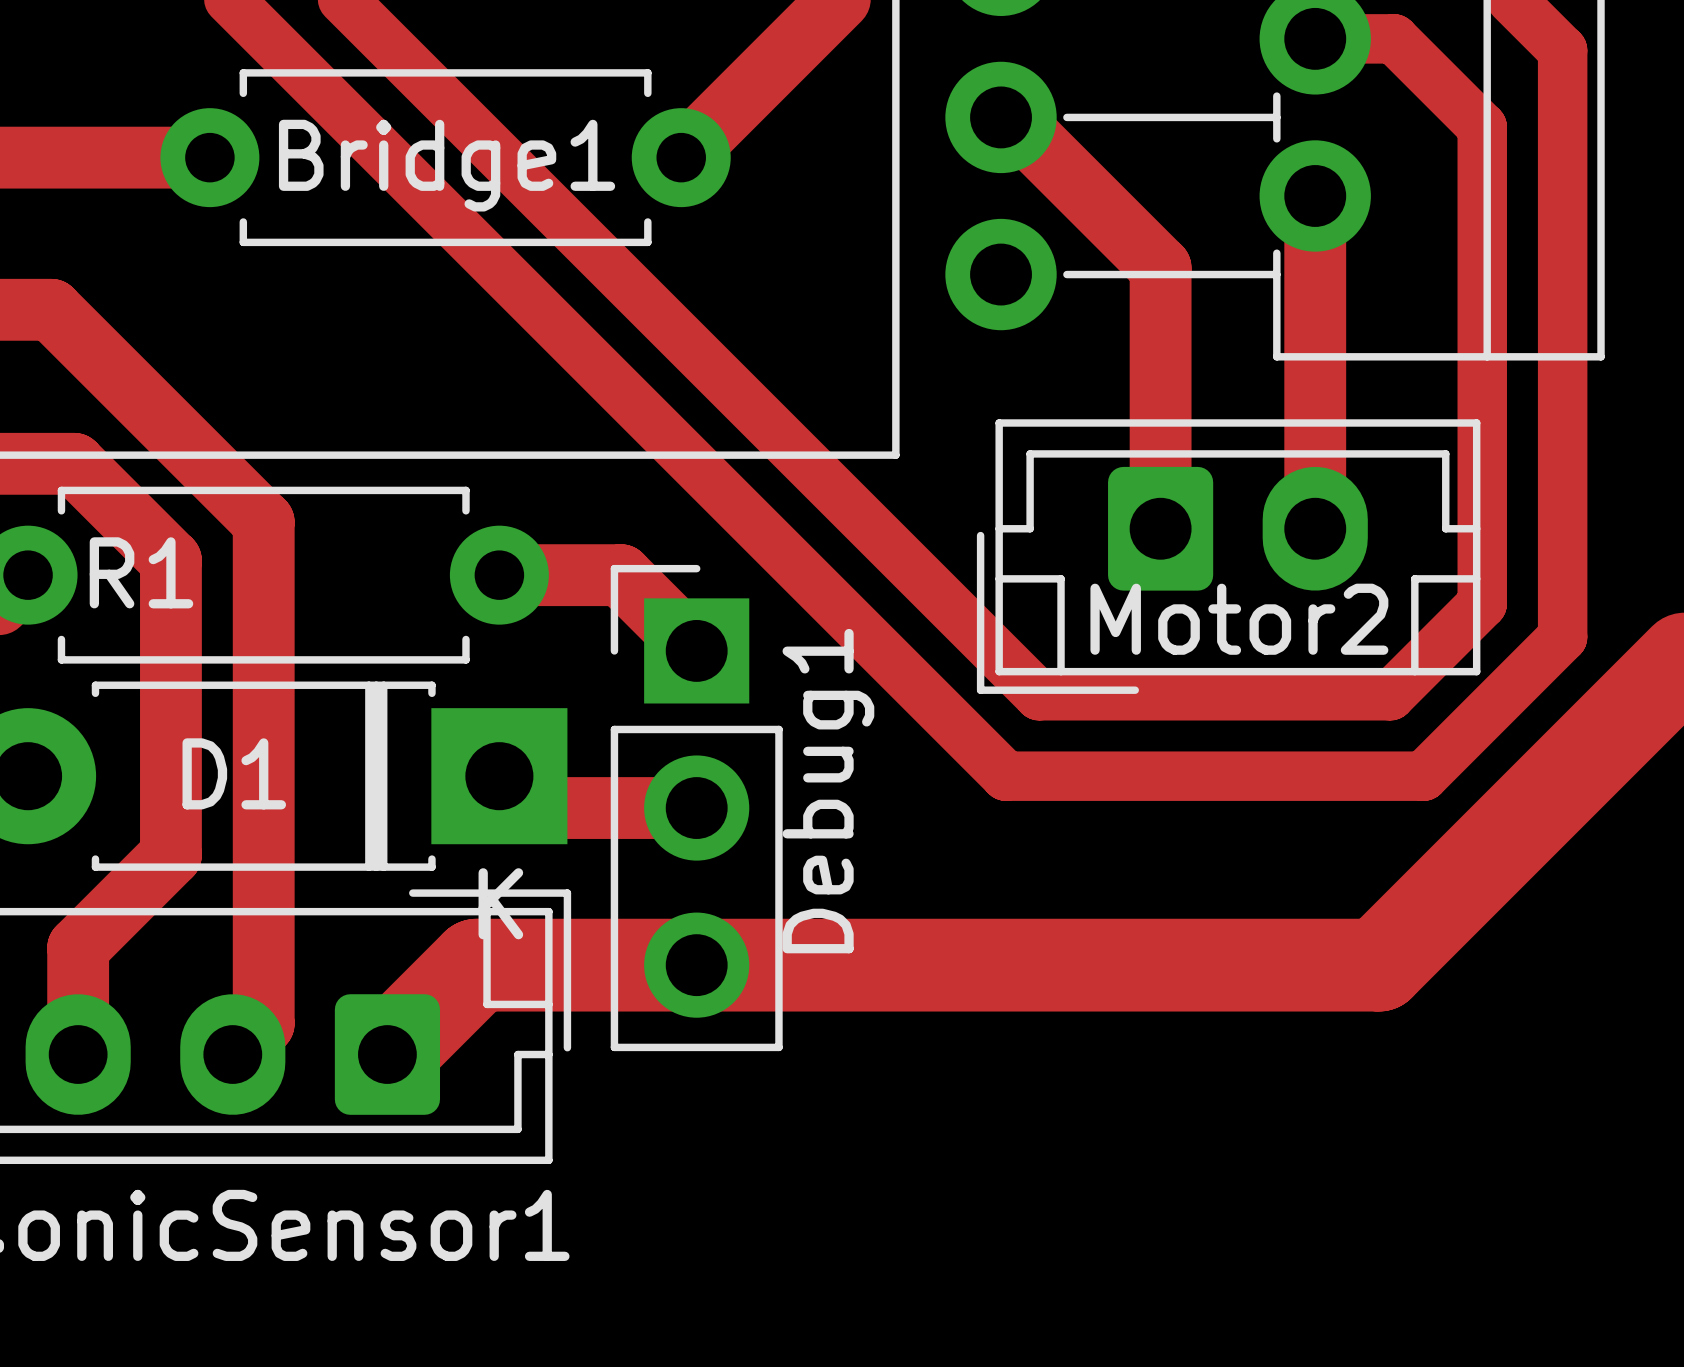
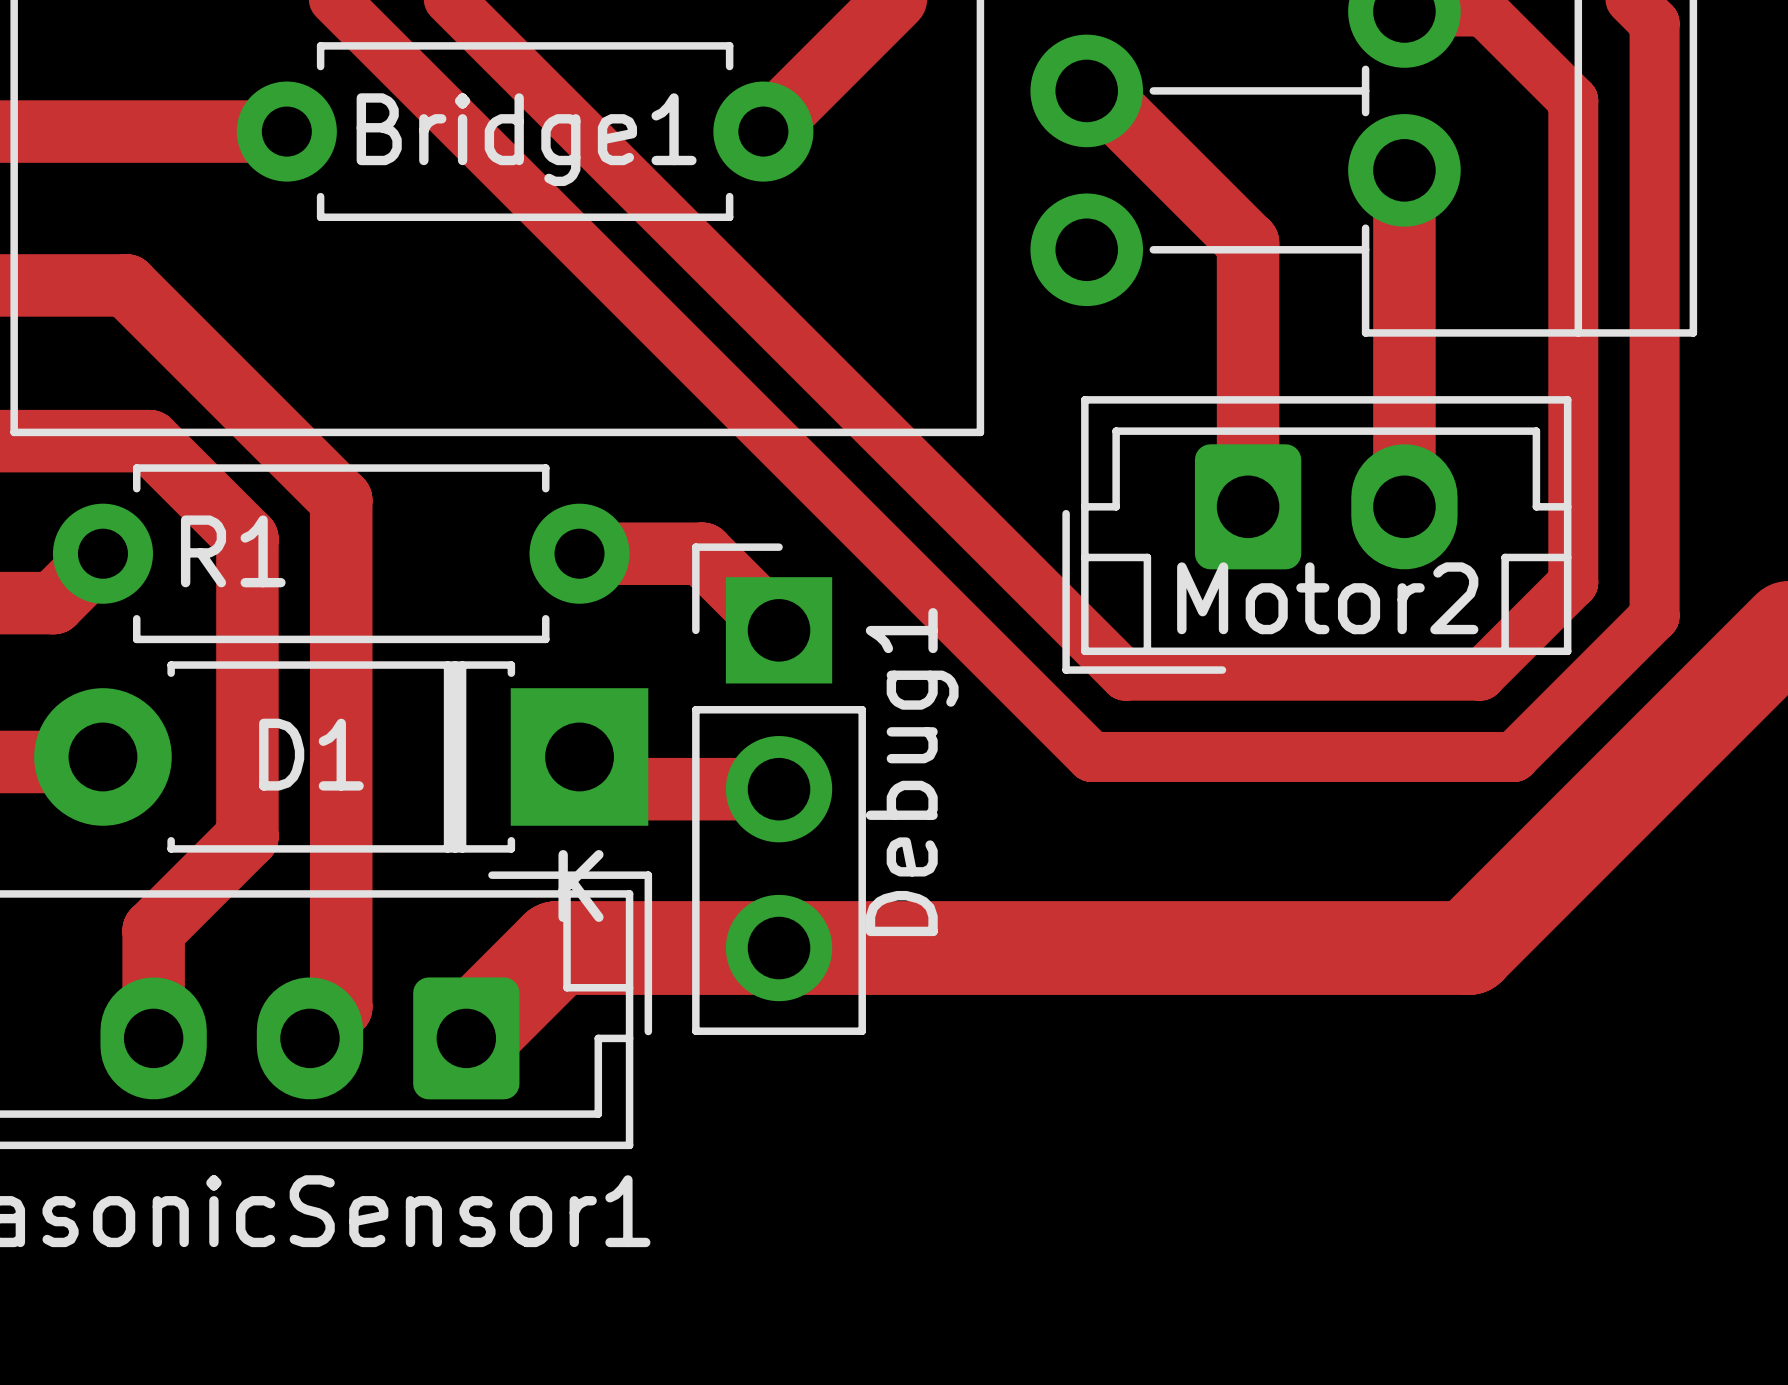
R1 name position: R1 (141, 572) -> R1 (233, 551)

